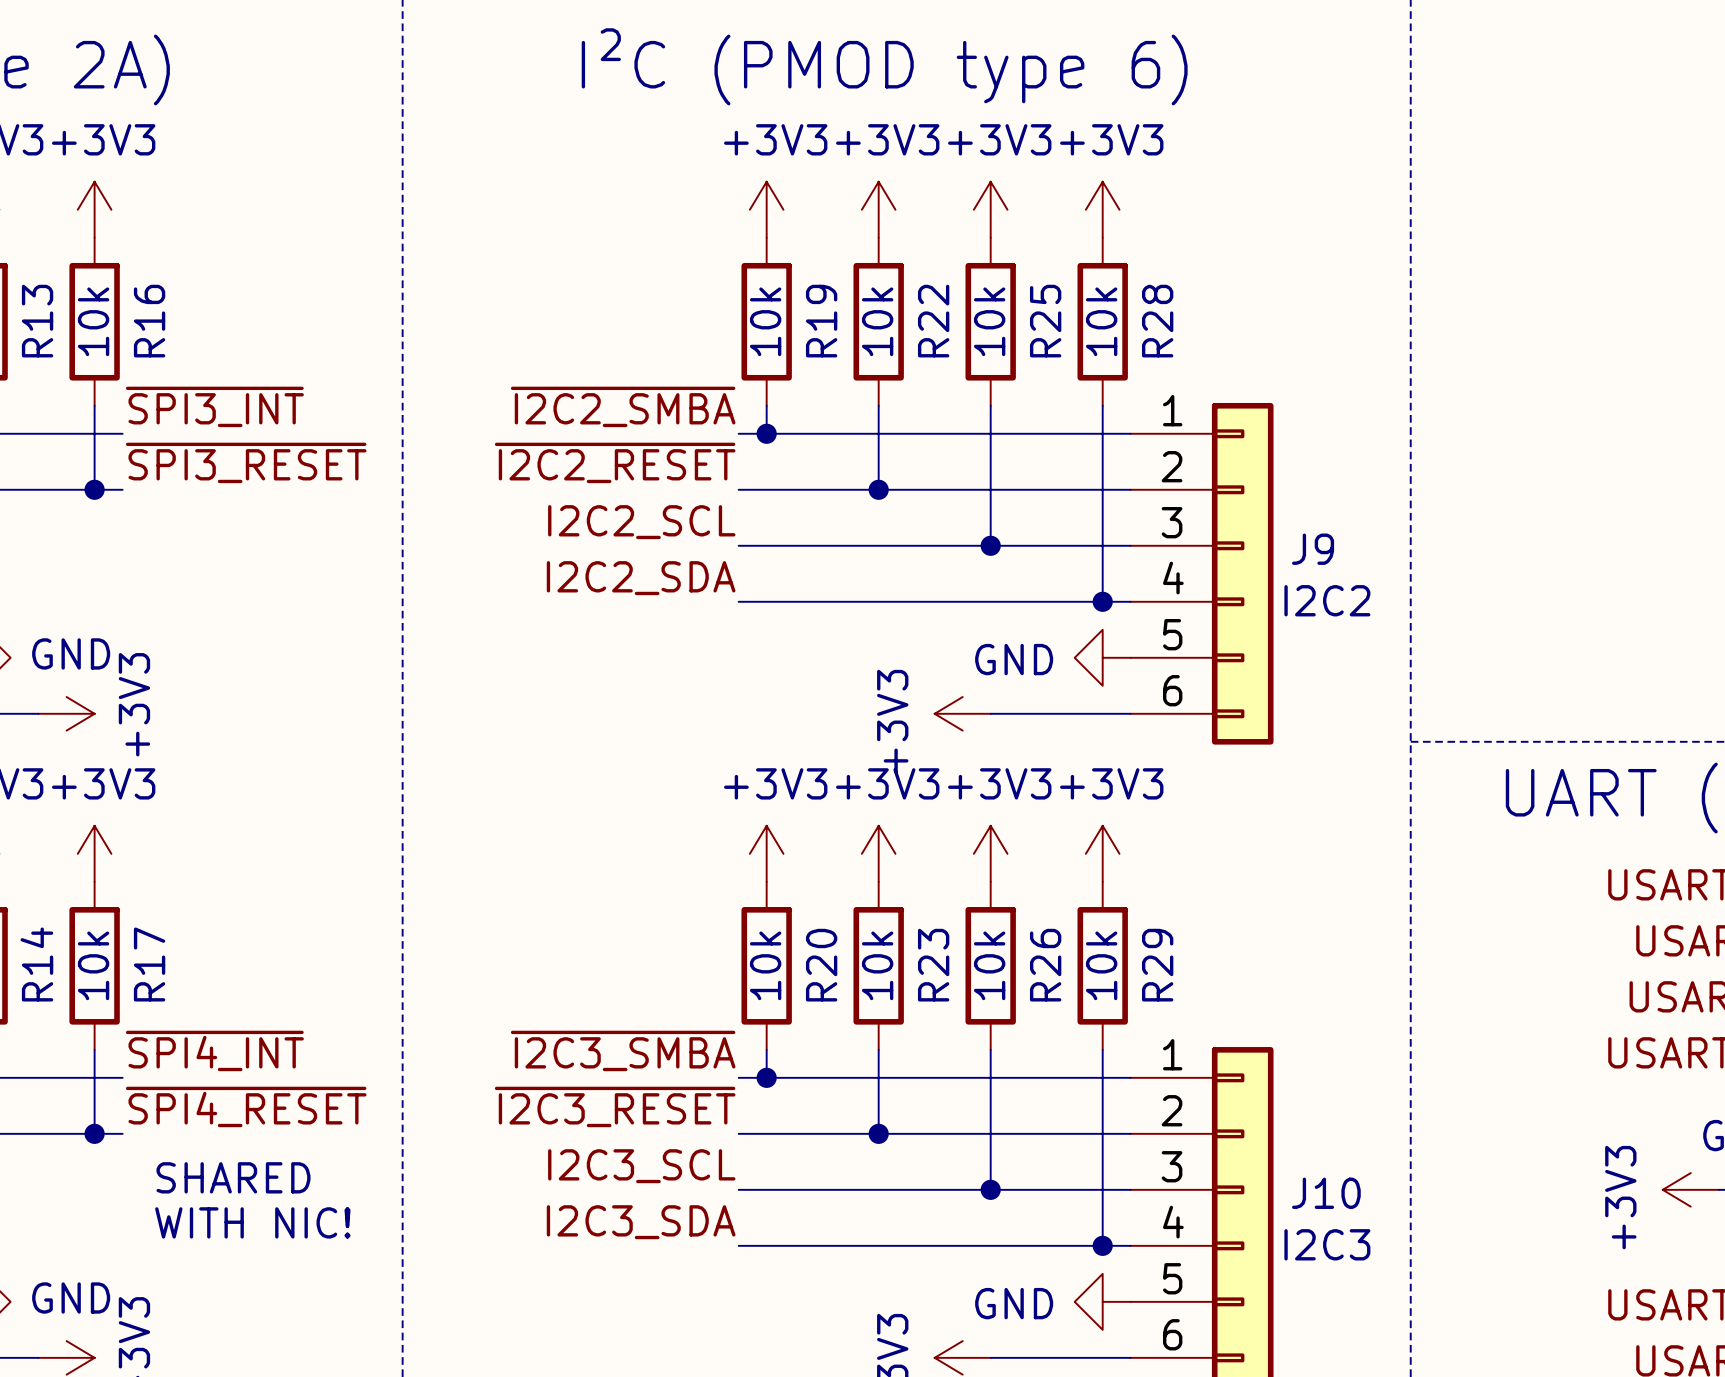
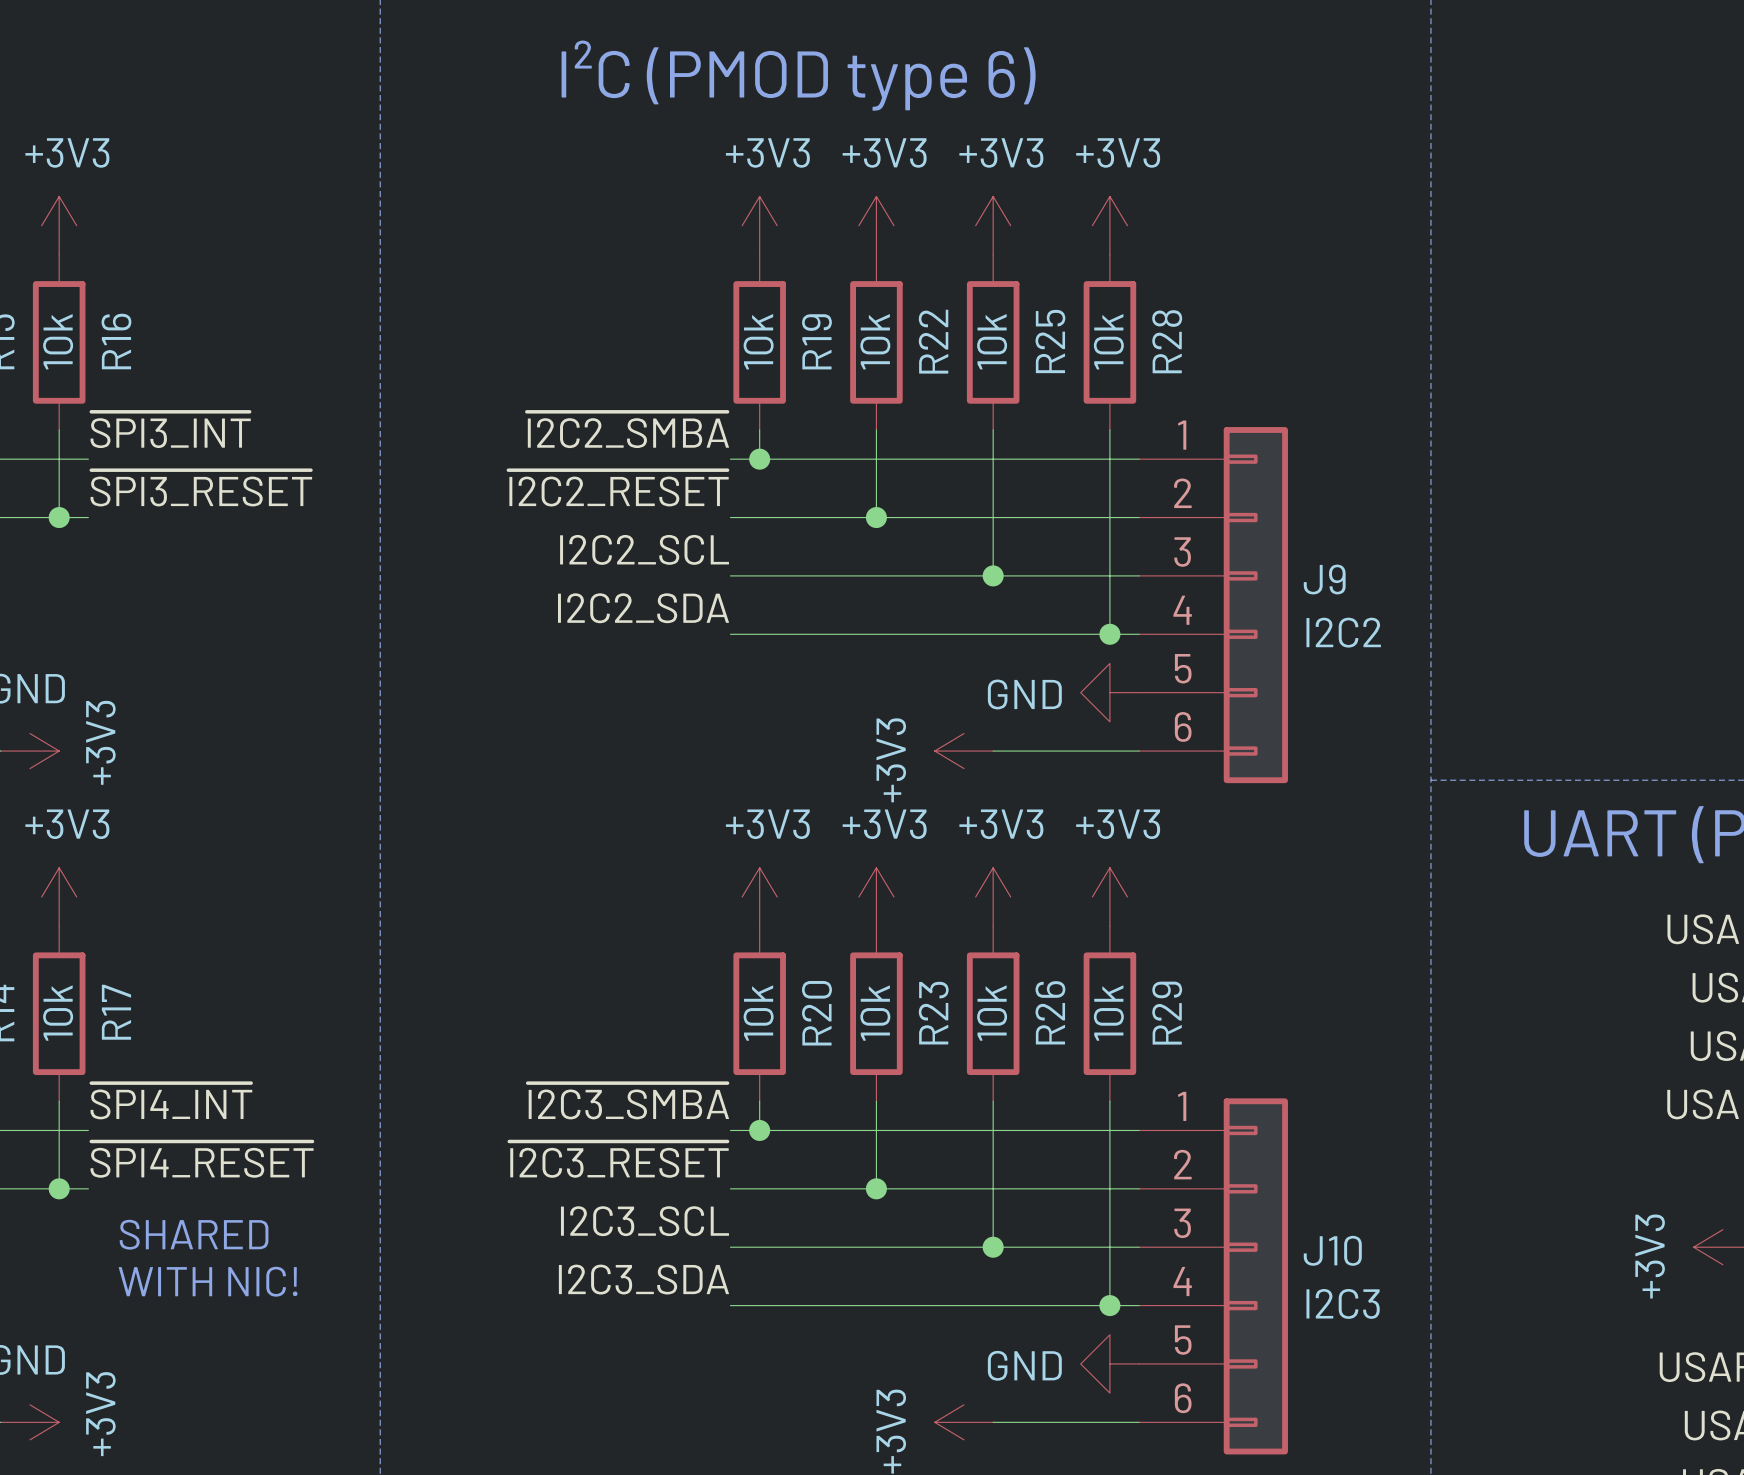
J9 text: I2C2 (1327, 600) -> none
J9 value: none -> I2C2 (1343, 632)
J10 text: I2C3 (1327, 1244) -> none
J10 value: none -> I2C3 (1343, 1303)

